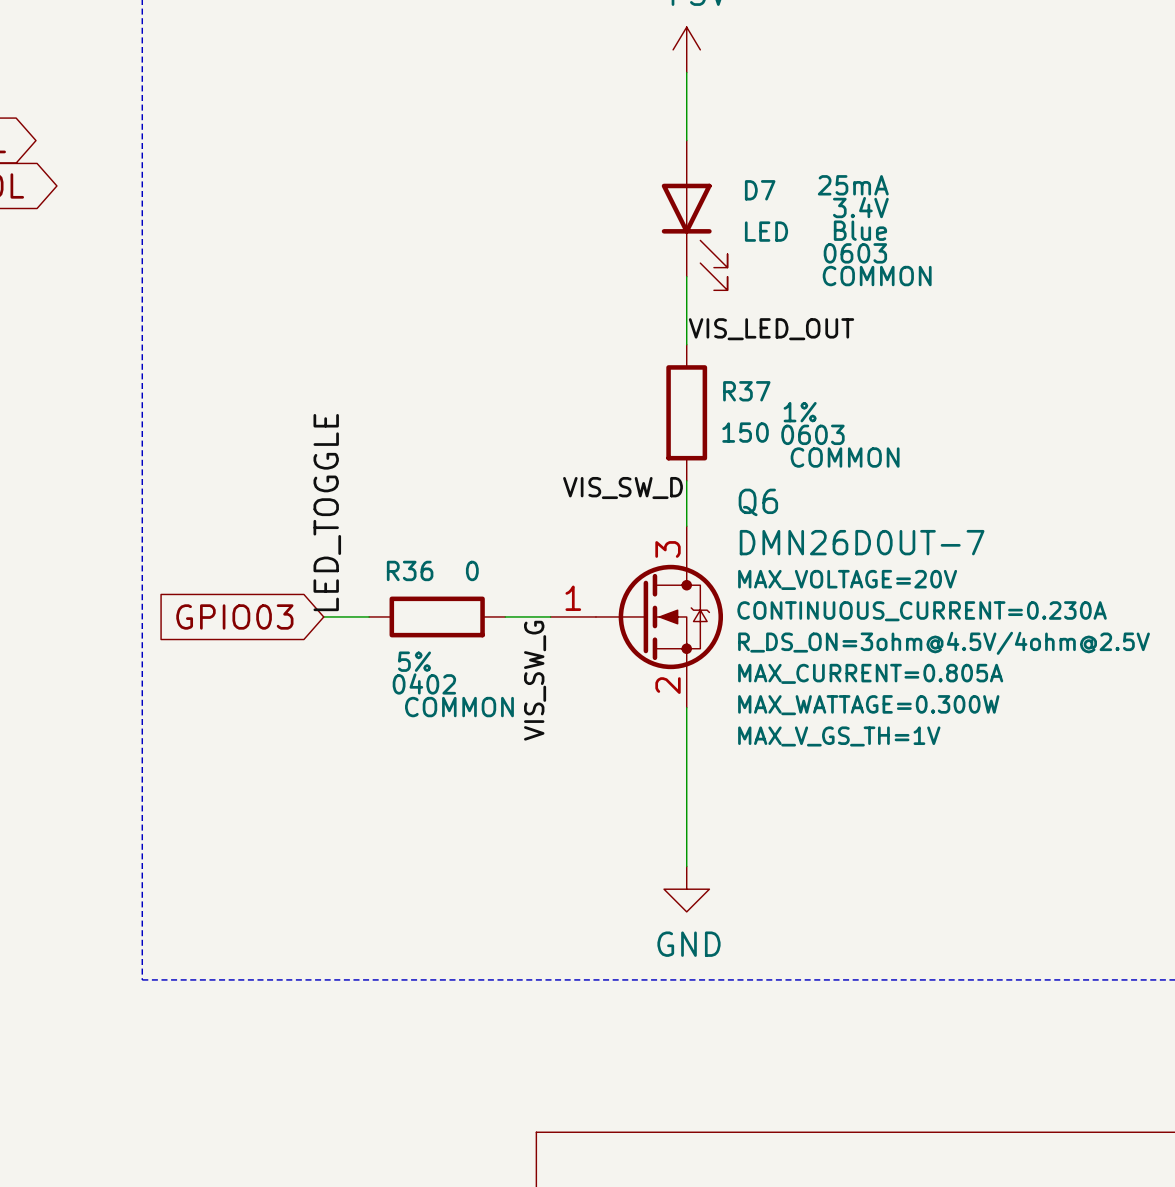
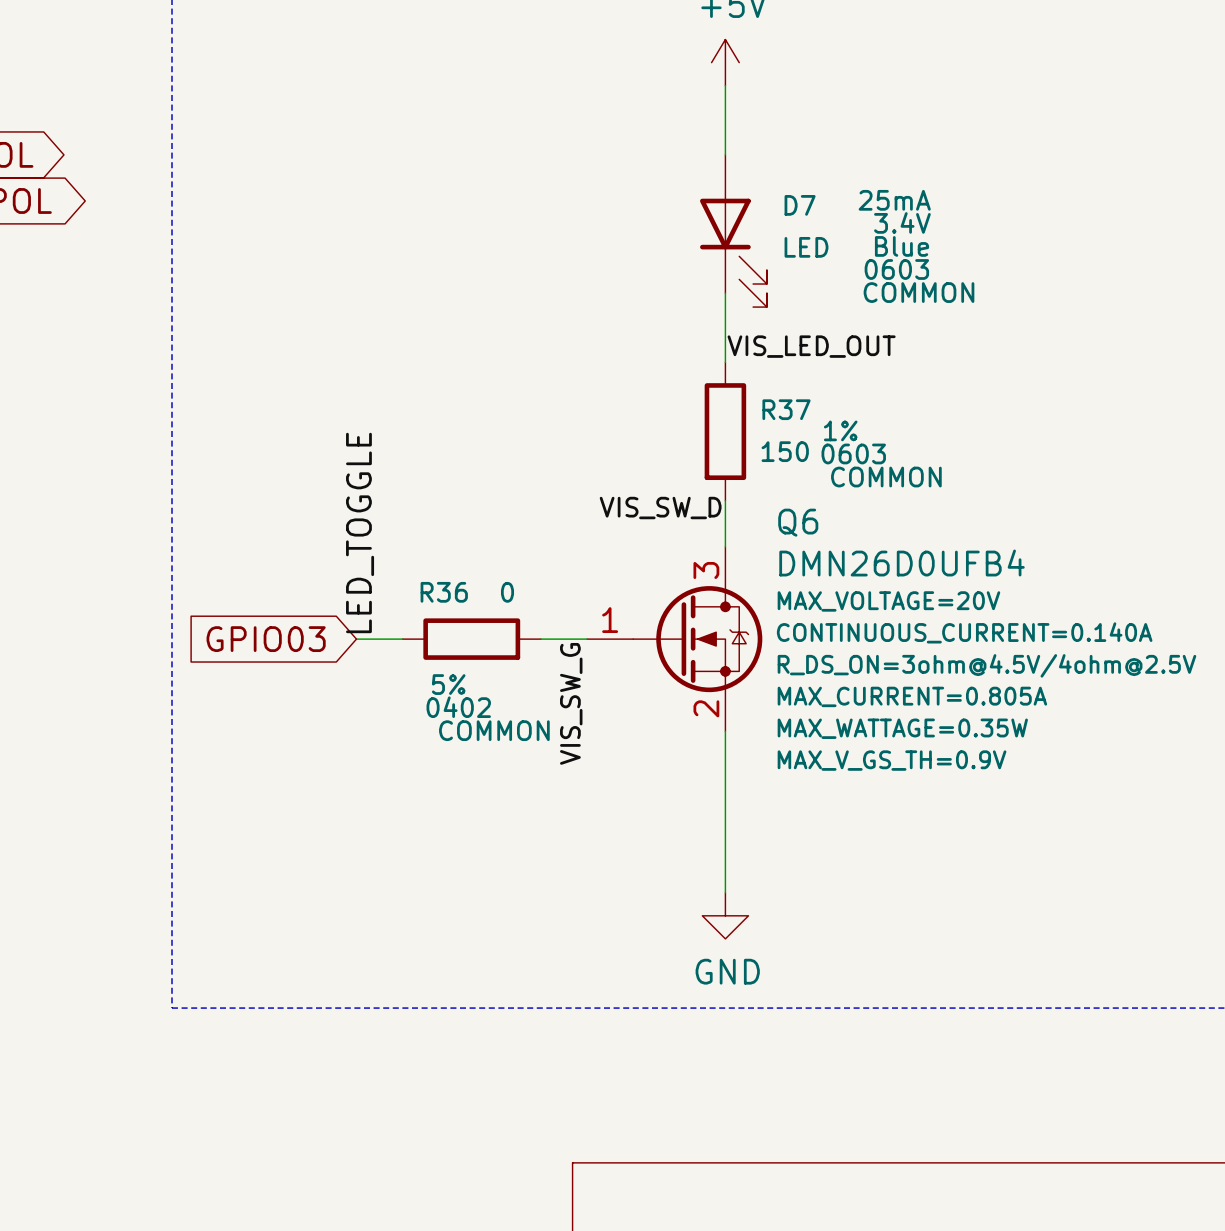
Q6 value: DMN26D0UT-7 (862, 542) -> DMN26D0UFB4 (902, 562)
Q6 text: CONTINUOUS_CURRENT=0.230A (922, 611) -> CONTINUOUS_CURRENT=0.140A (964, 632)
Q6 text: MAX_WATTAGE=0.300W (868, 705) -> MAX_WATTAGE=0.35W (902, 728)
Q6 text: MAX_V_GS_TH=1V (839, 736) -> MAX_V_GS_TH=0.9V (892, 760)

